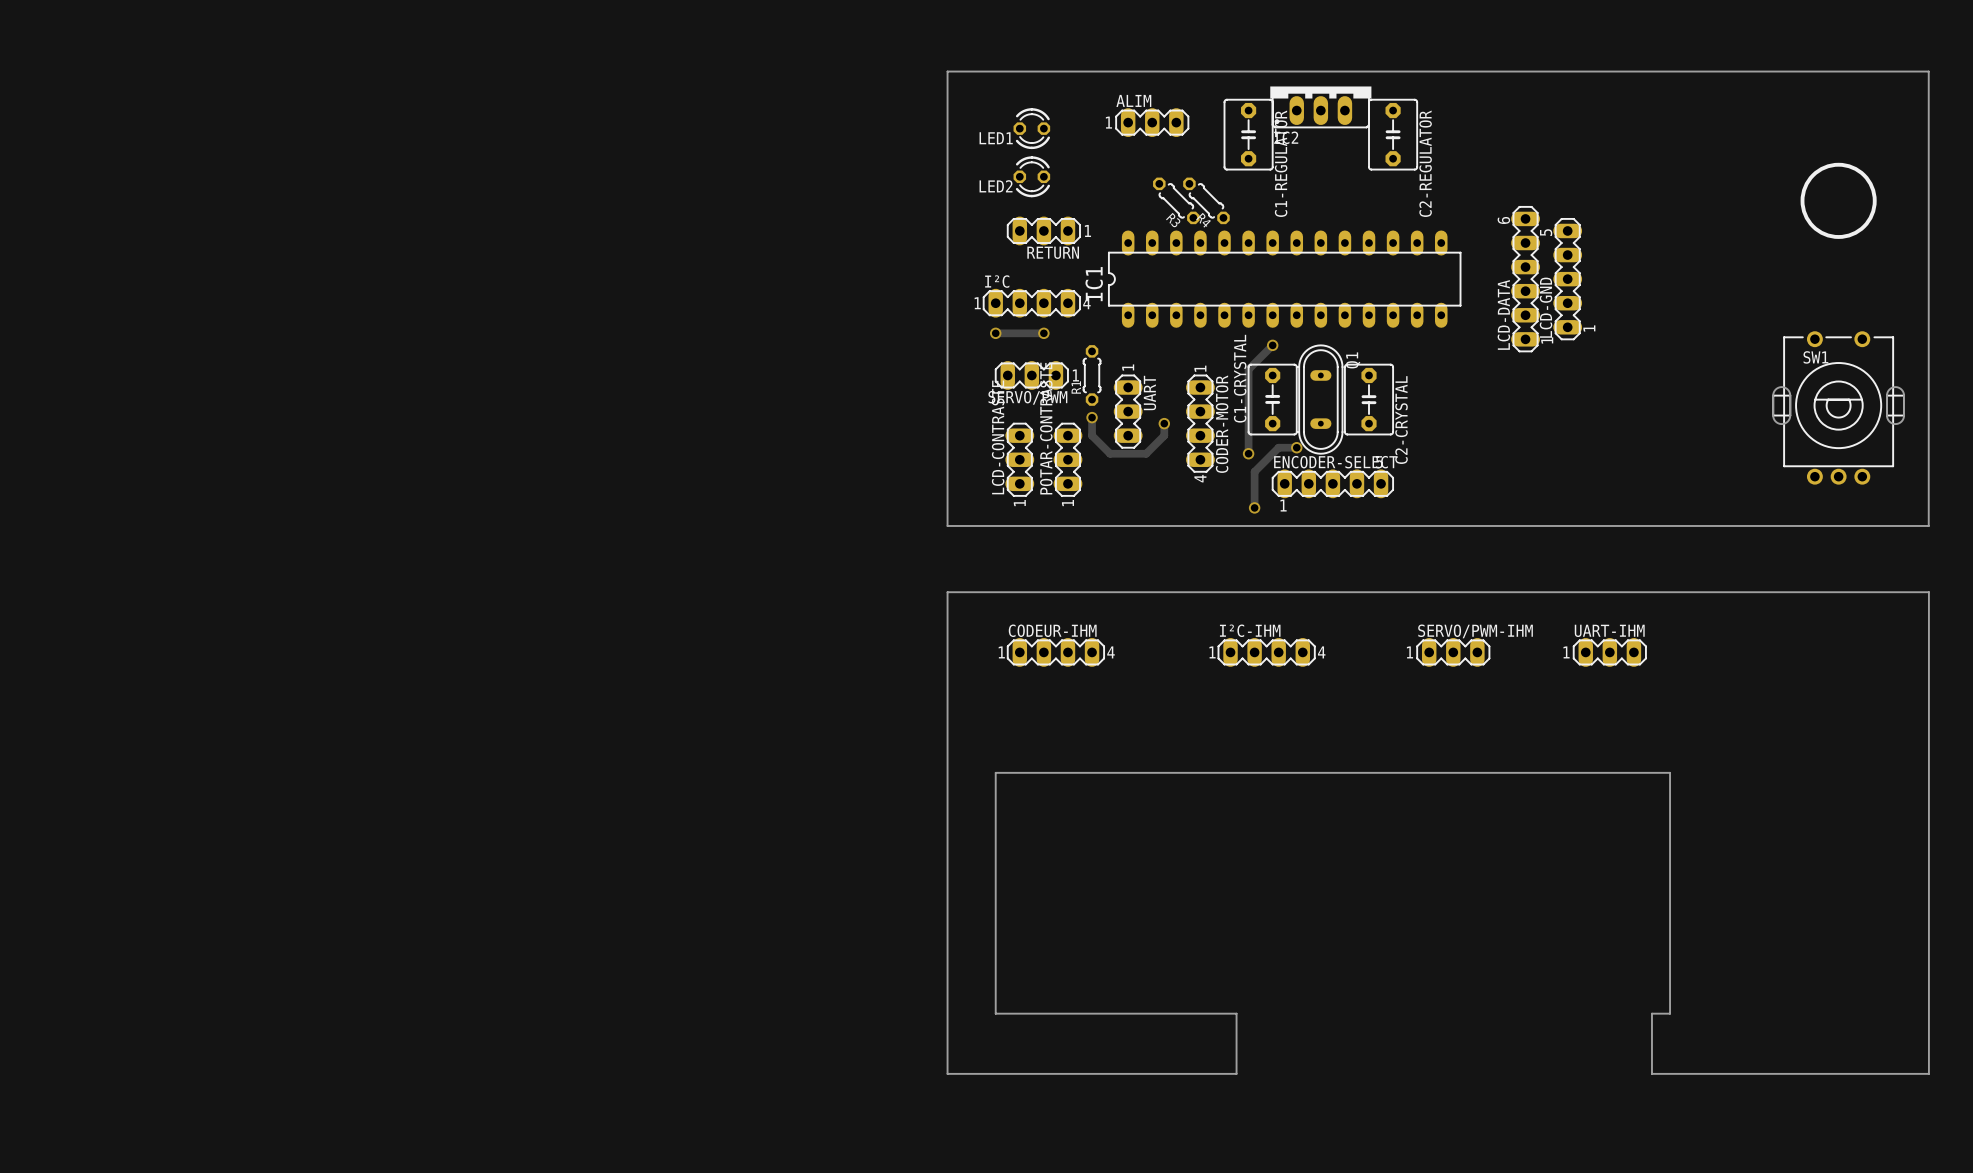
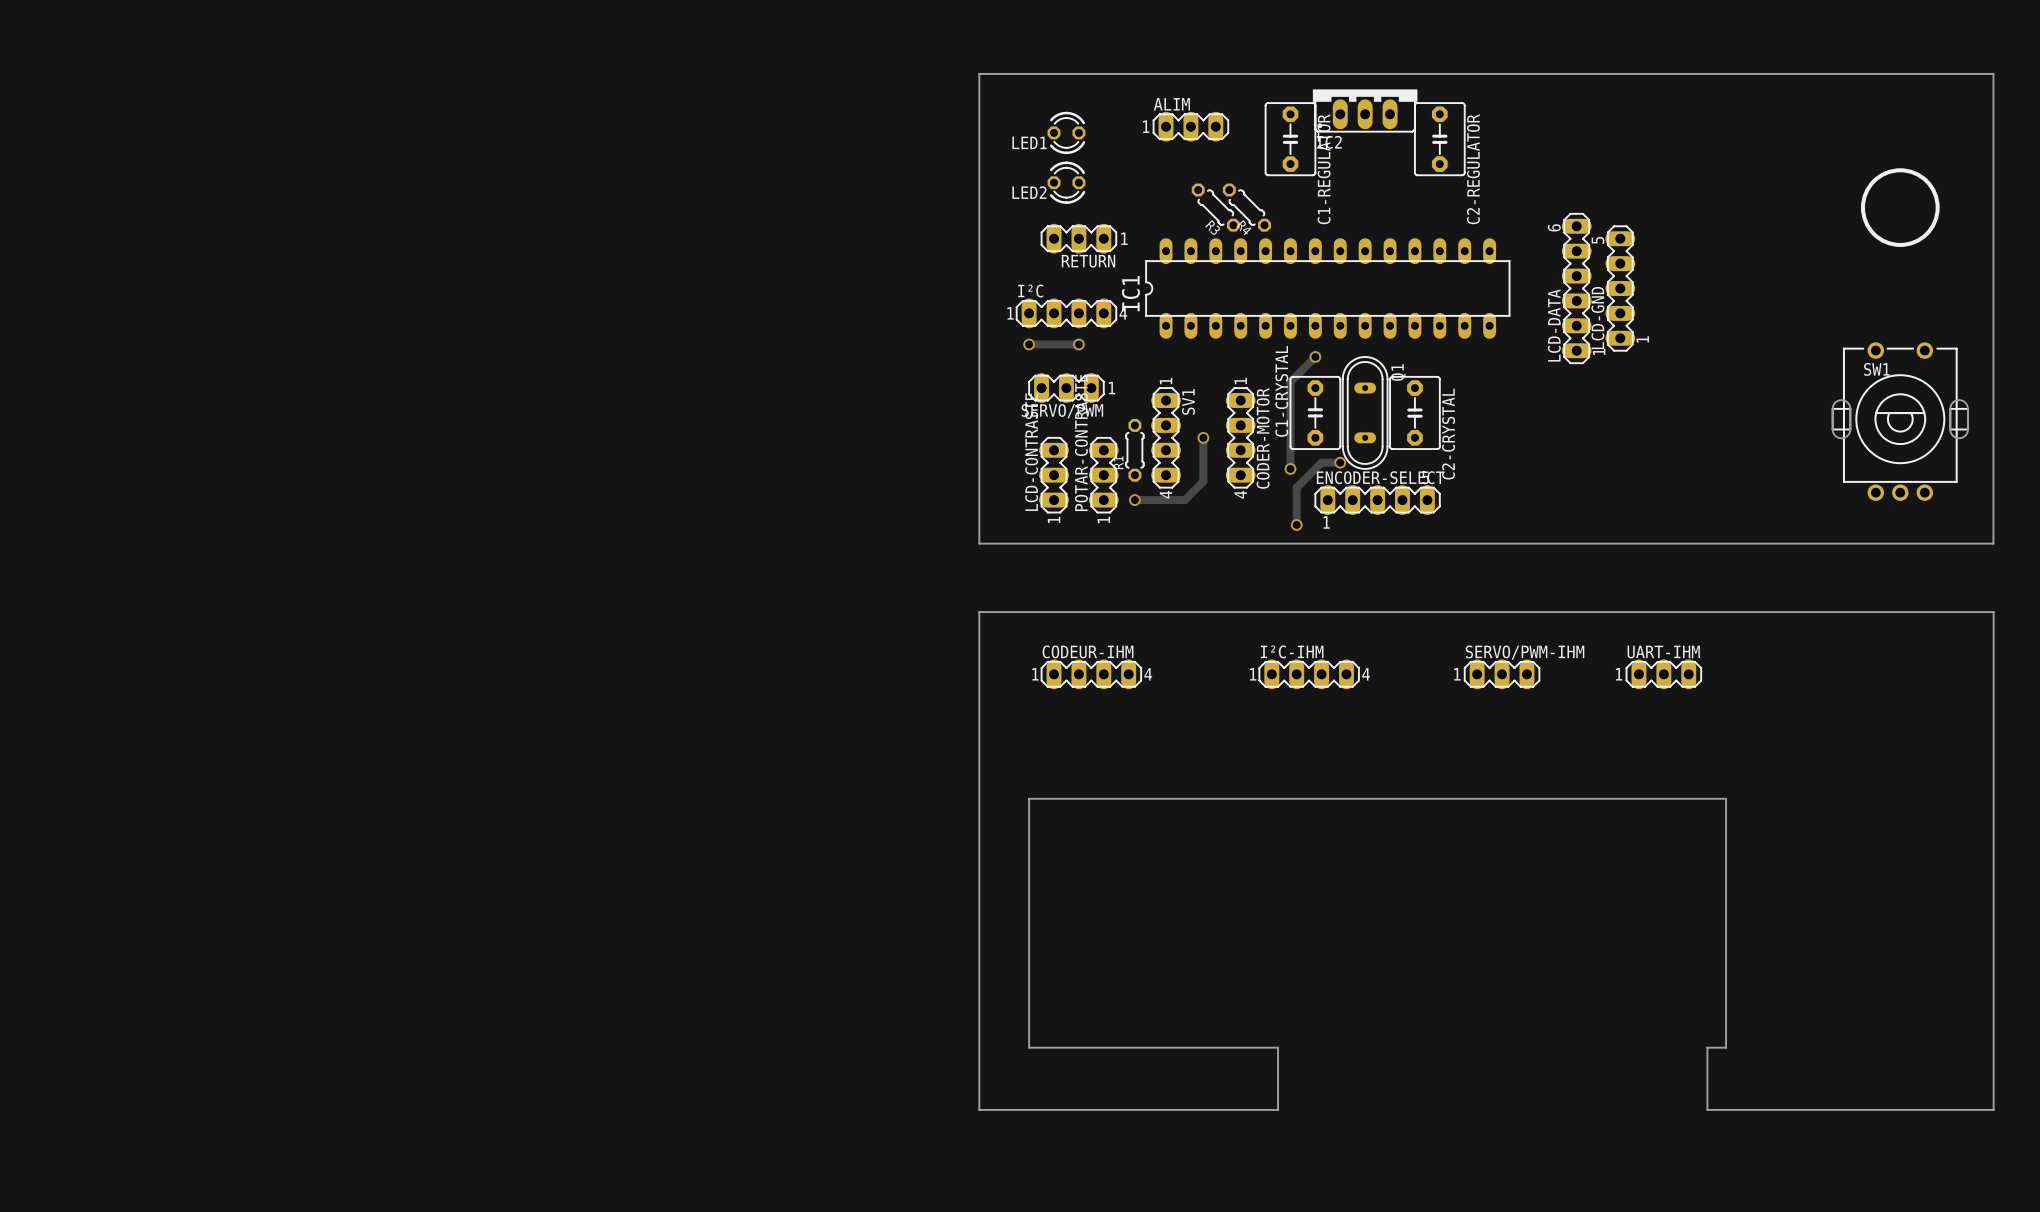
R1 position: (1092, 375) -> (1134, 450)
UART: (1128, 411) -> none
track: (1092, 417) (1092, 435) (1110, 453) (1146, 453) (1164, 435) -> (1134, 500) (1184, 500) (1203, 481) (1203, 450)
via: (1092, 417) -> none
SV1: none -> (1166, 437)
via: none -> (1134, 500)

